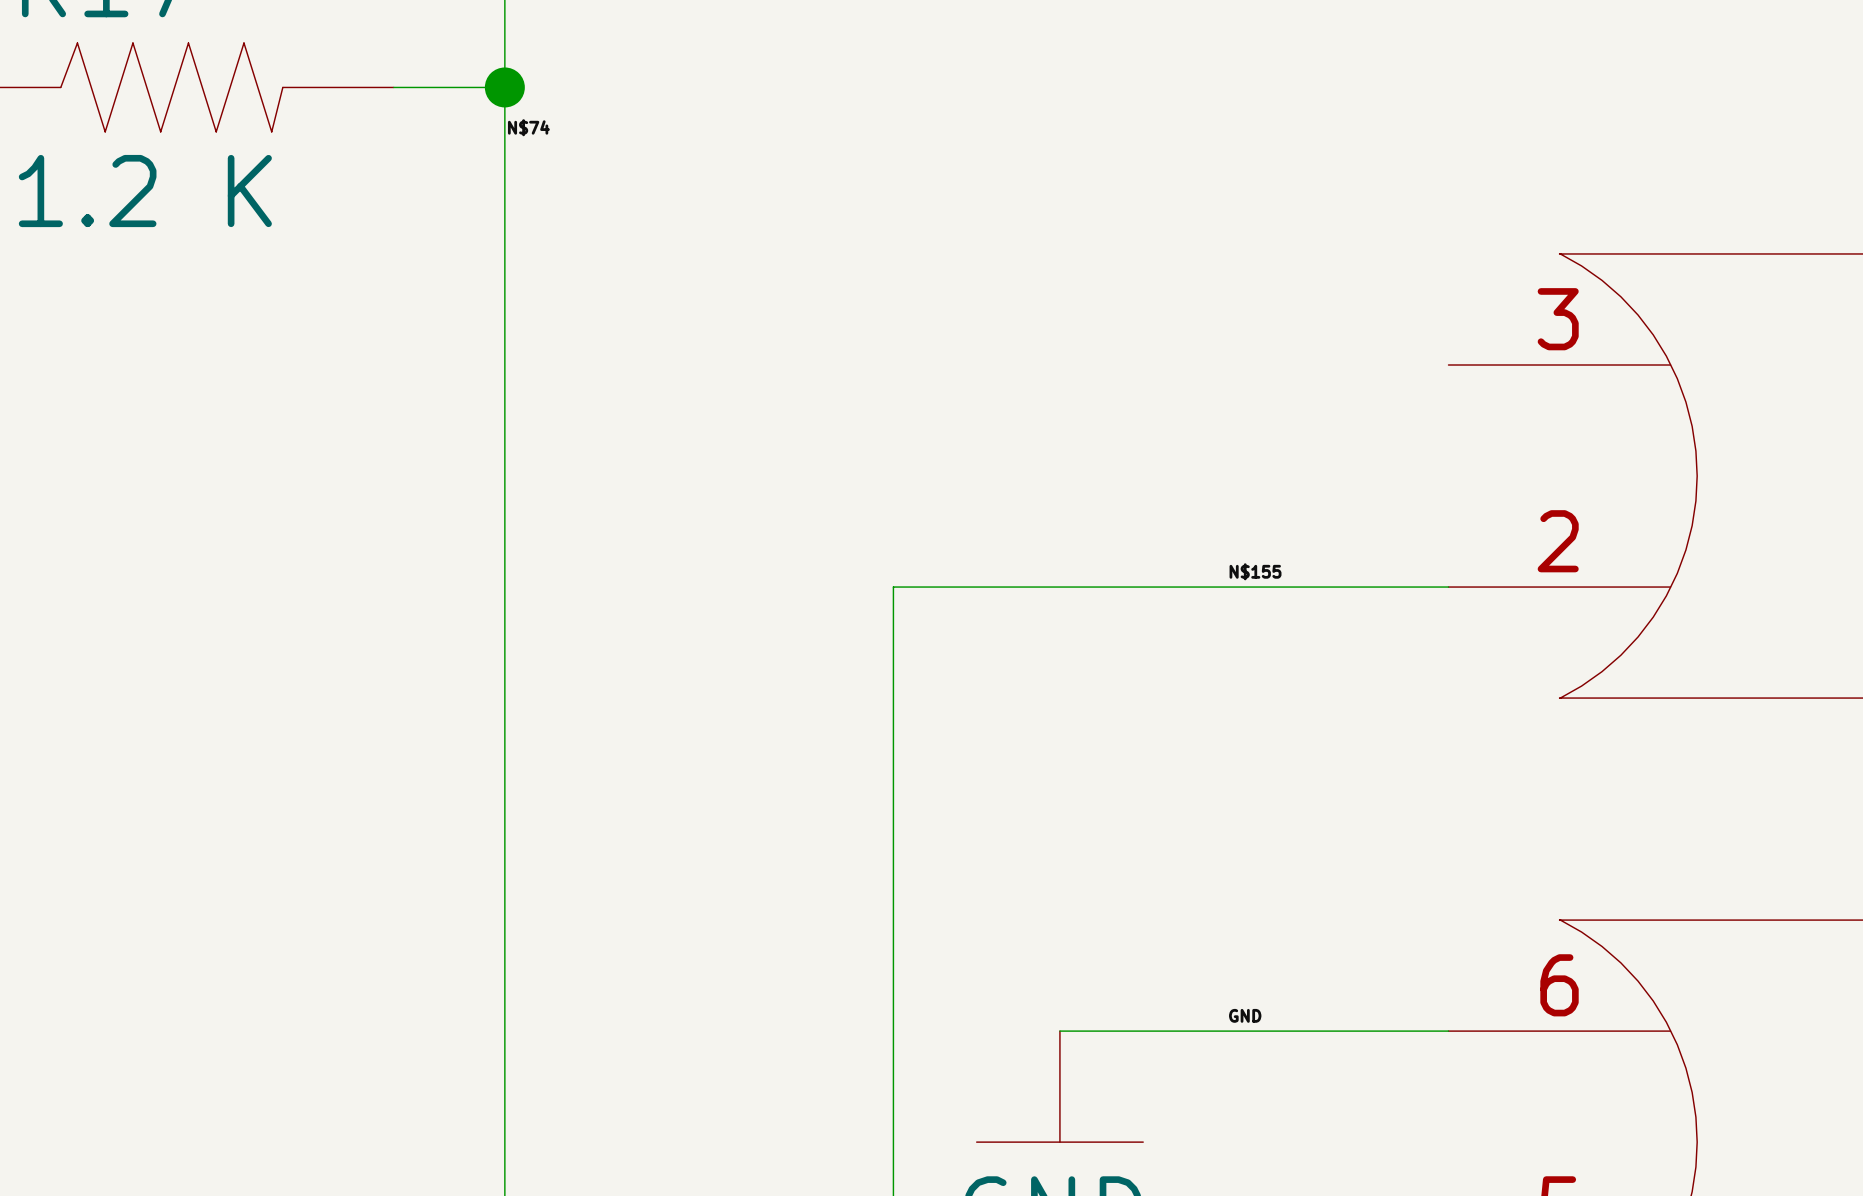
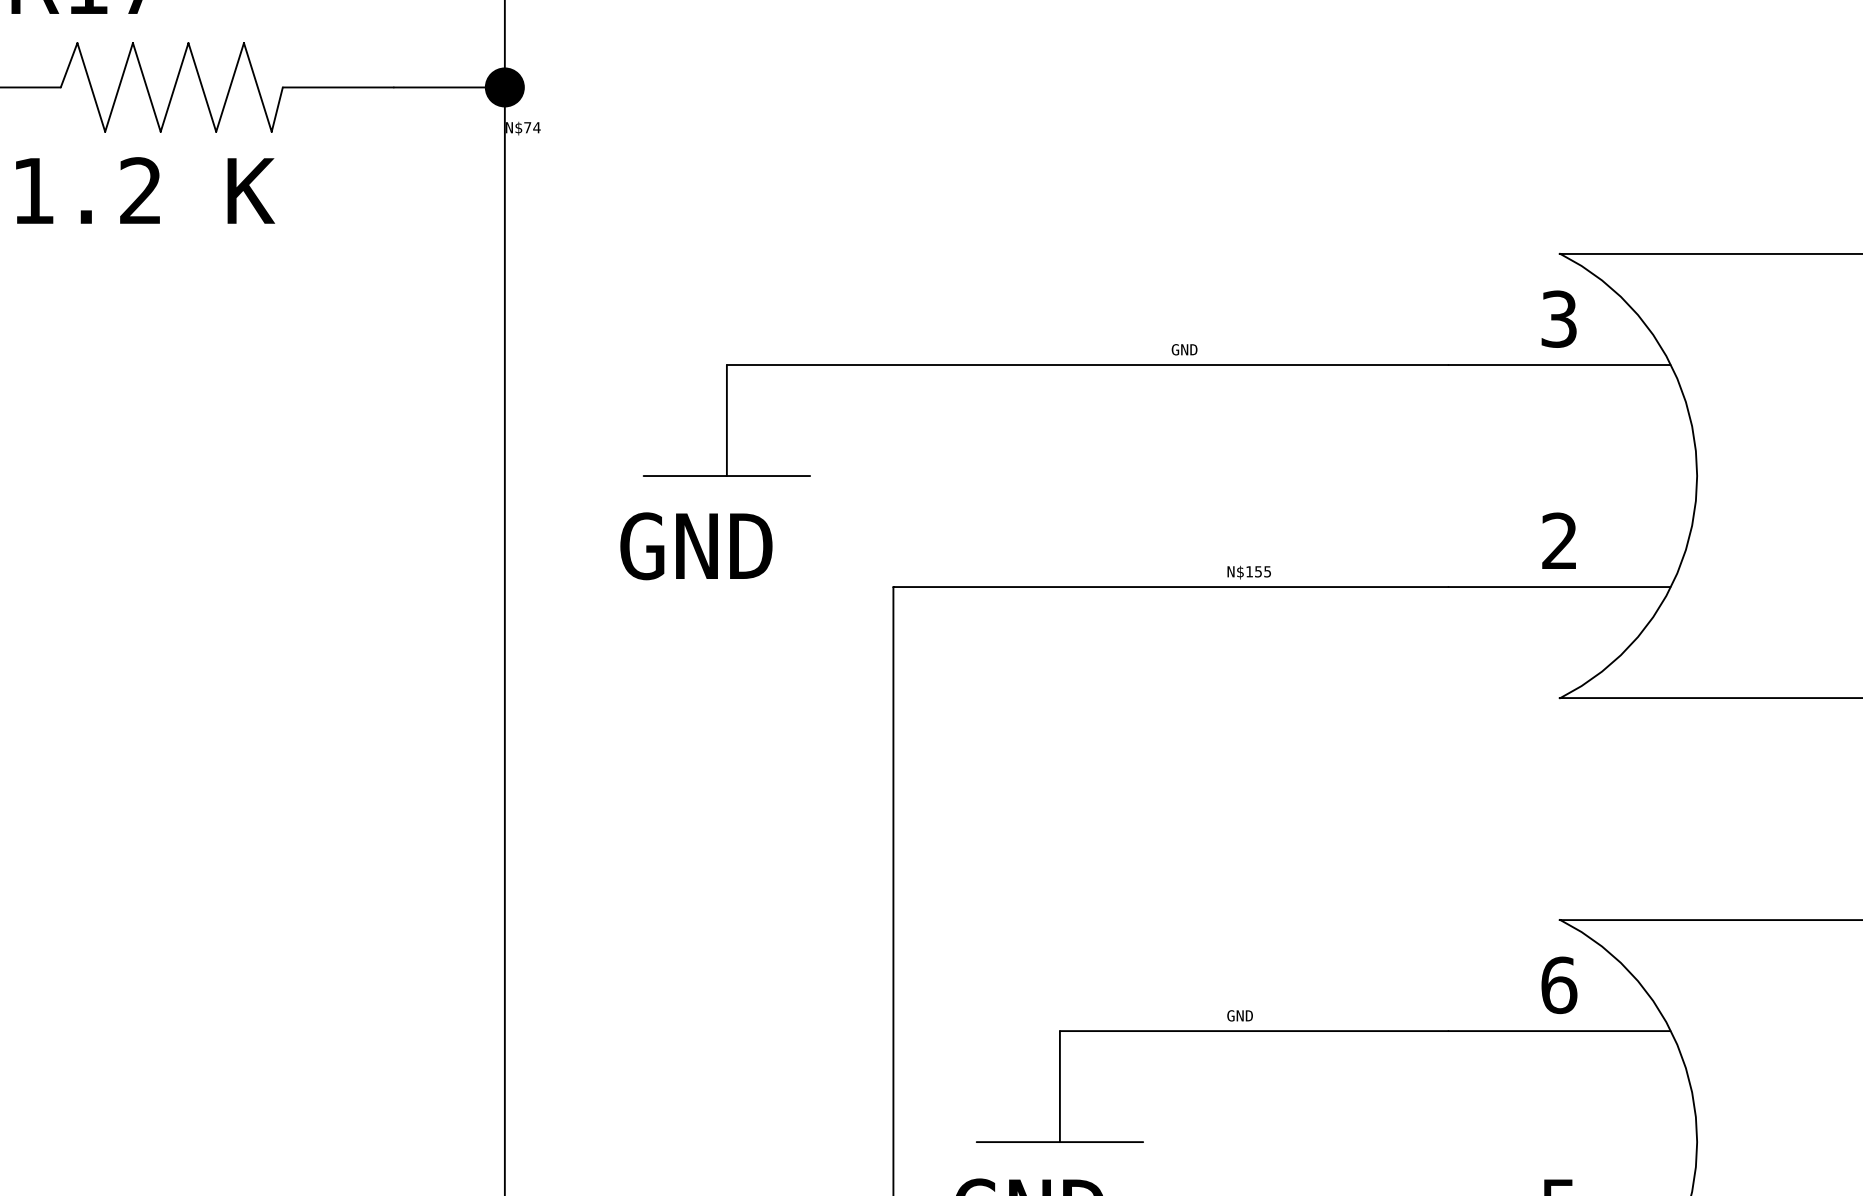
label: none -> GND (1184, 349)
wire: none -> (726, 365) (1448, 365)
power symbol: none -> GND (726, 420)

